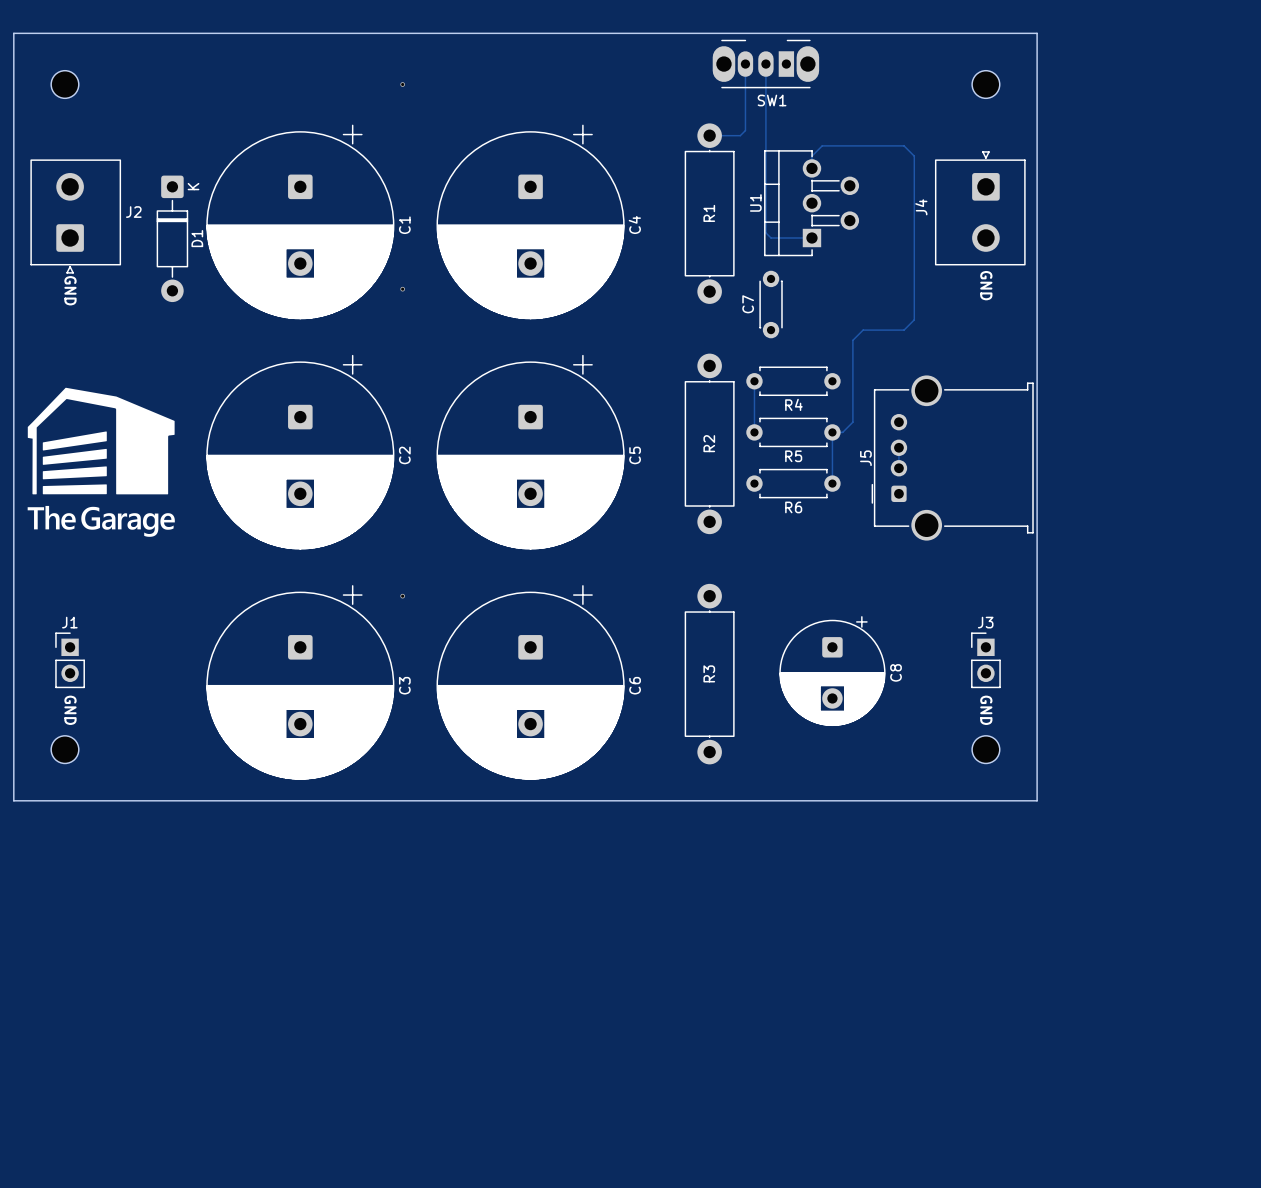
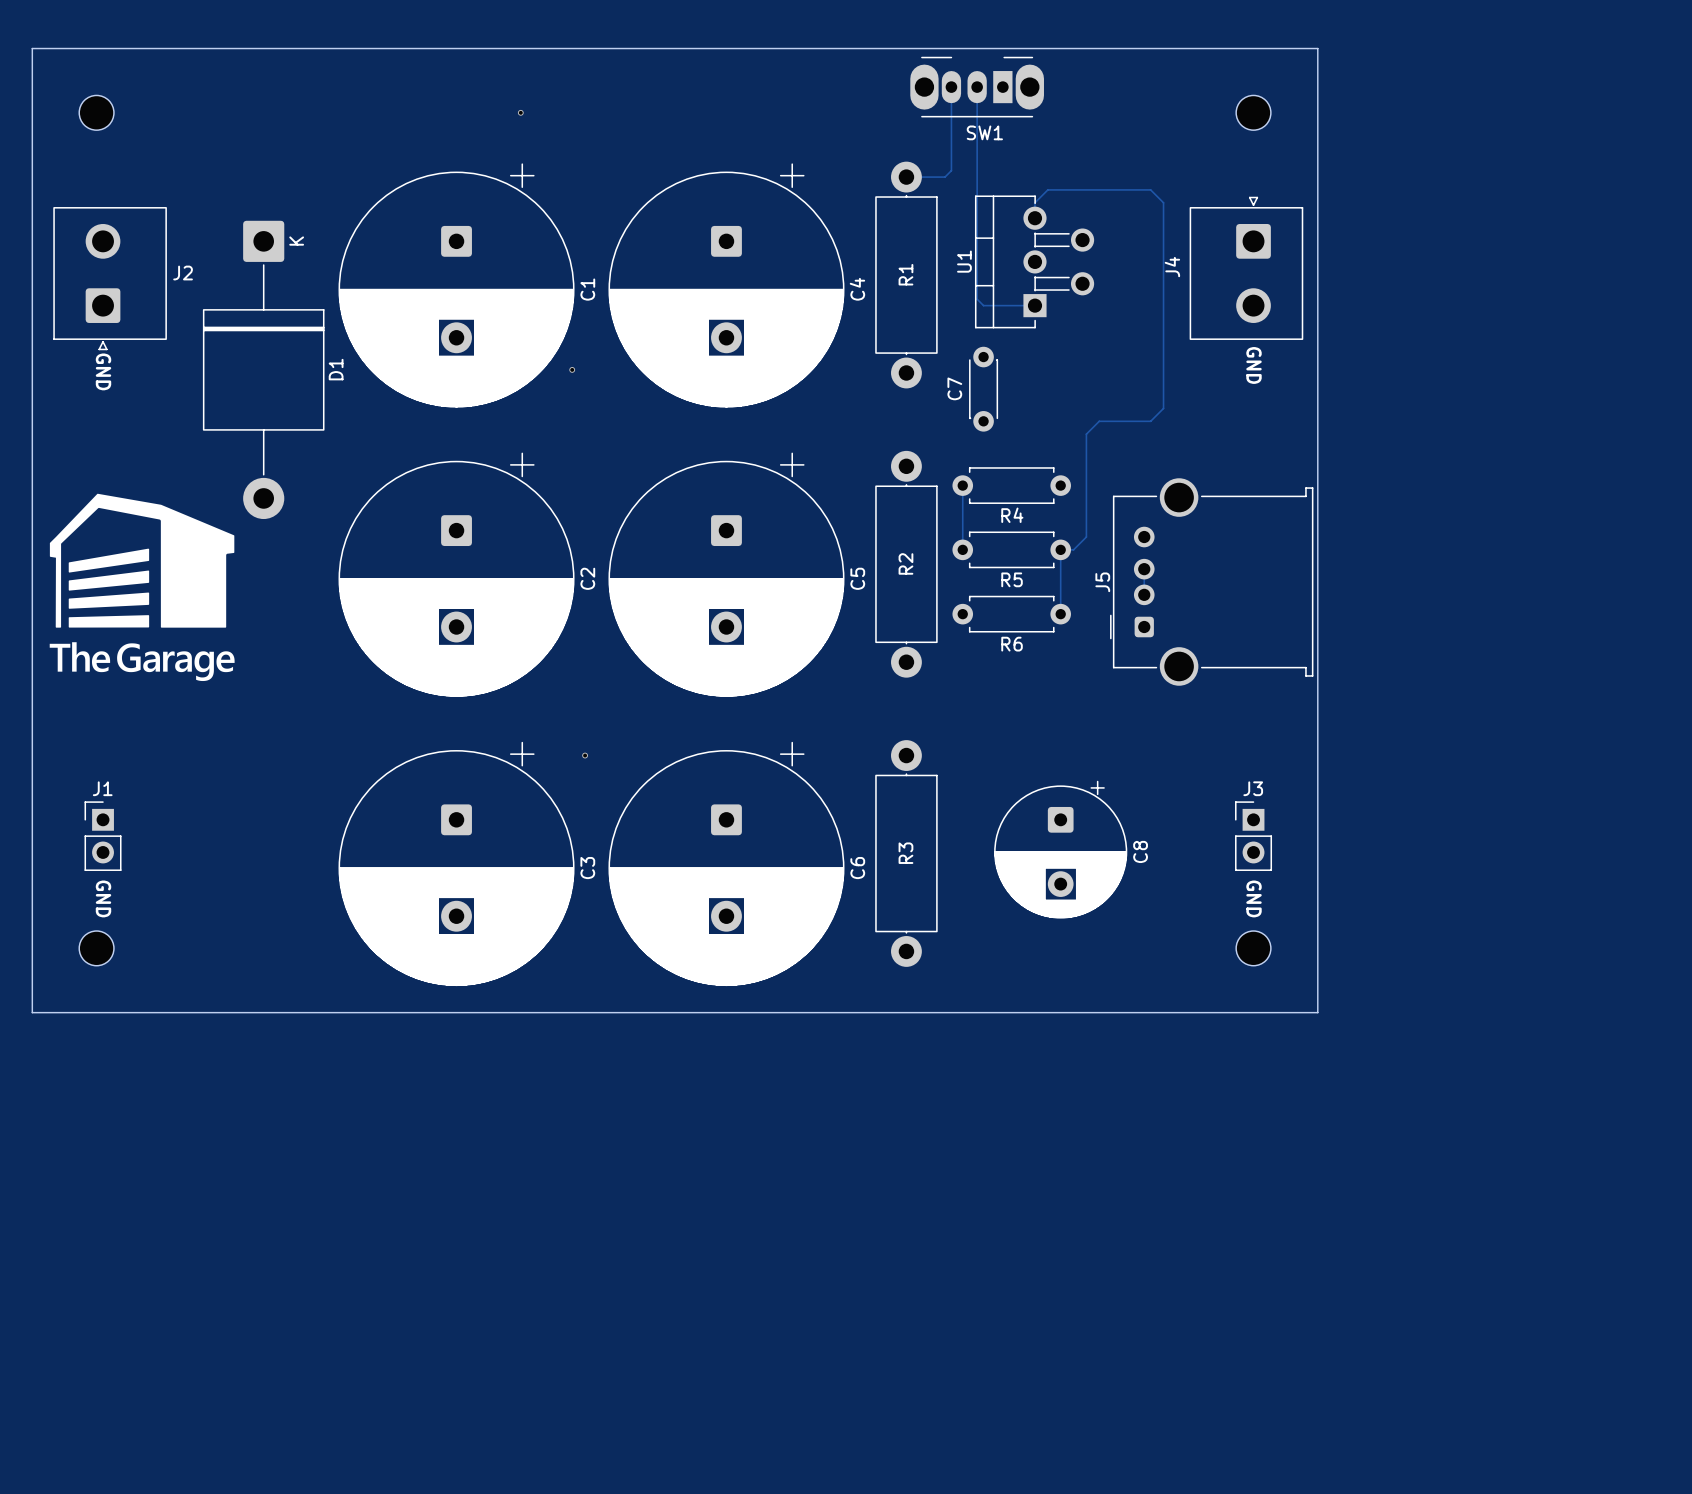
D1 footprint: [156, 175, 189, 303] -> [202, 220, 325, 520]
C1 position: (300, 221) -> (456, 285)
C4 position: (530, 221) -> (726, 285)
D1 name position: D1 (197, 238) -> D1 (336, 369)
via position: (402, 289) -> (572, 369)
C2 position: (300, 452) -> (456, 574)
C5 position: (530, 452) -> (726, 574)
via position: (402, 596) -> (585, 755)
C3 position: (300, 682) -> (456, 863)
C6 position: (530, 682) -> (726, 863)

